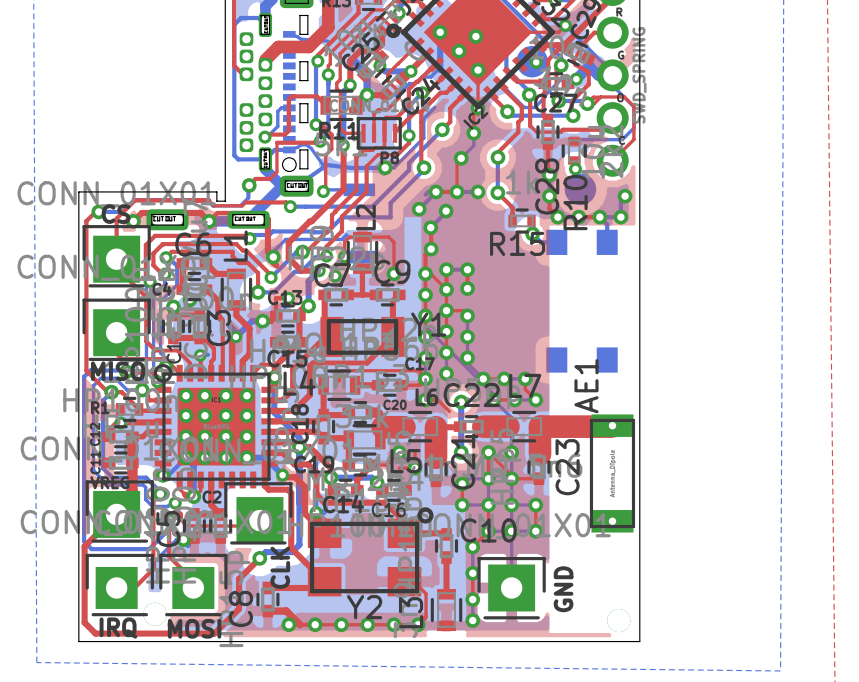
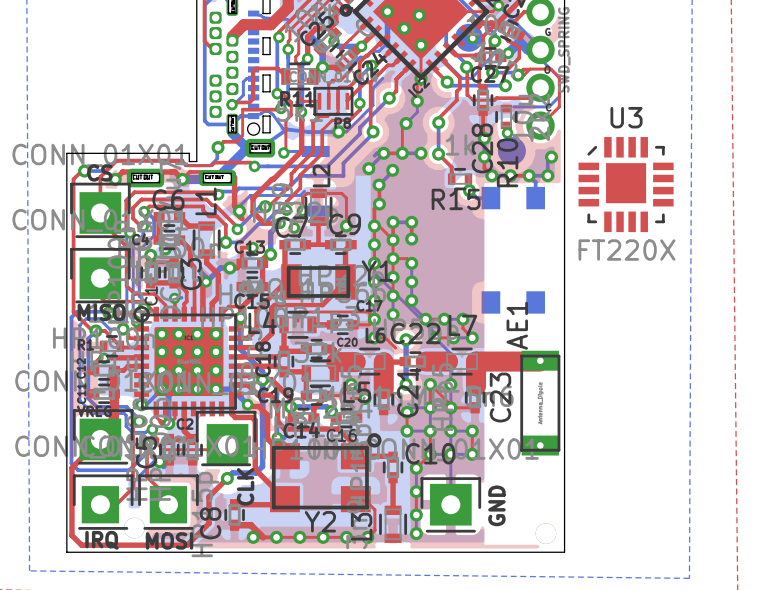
U3: none -> FT220X (626, 184)

